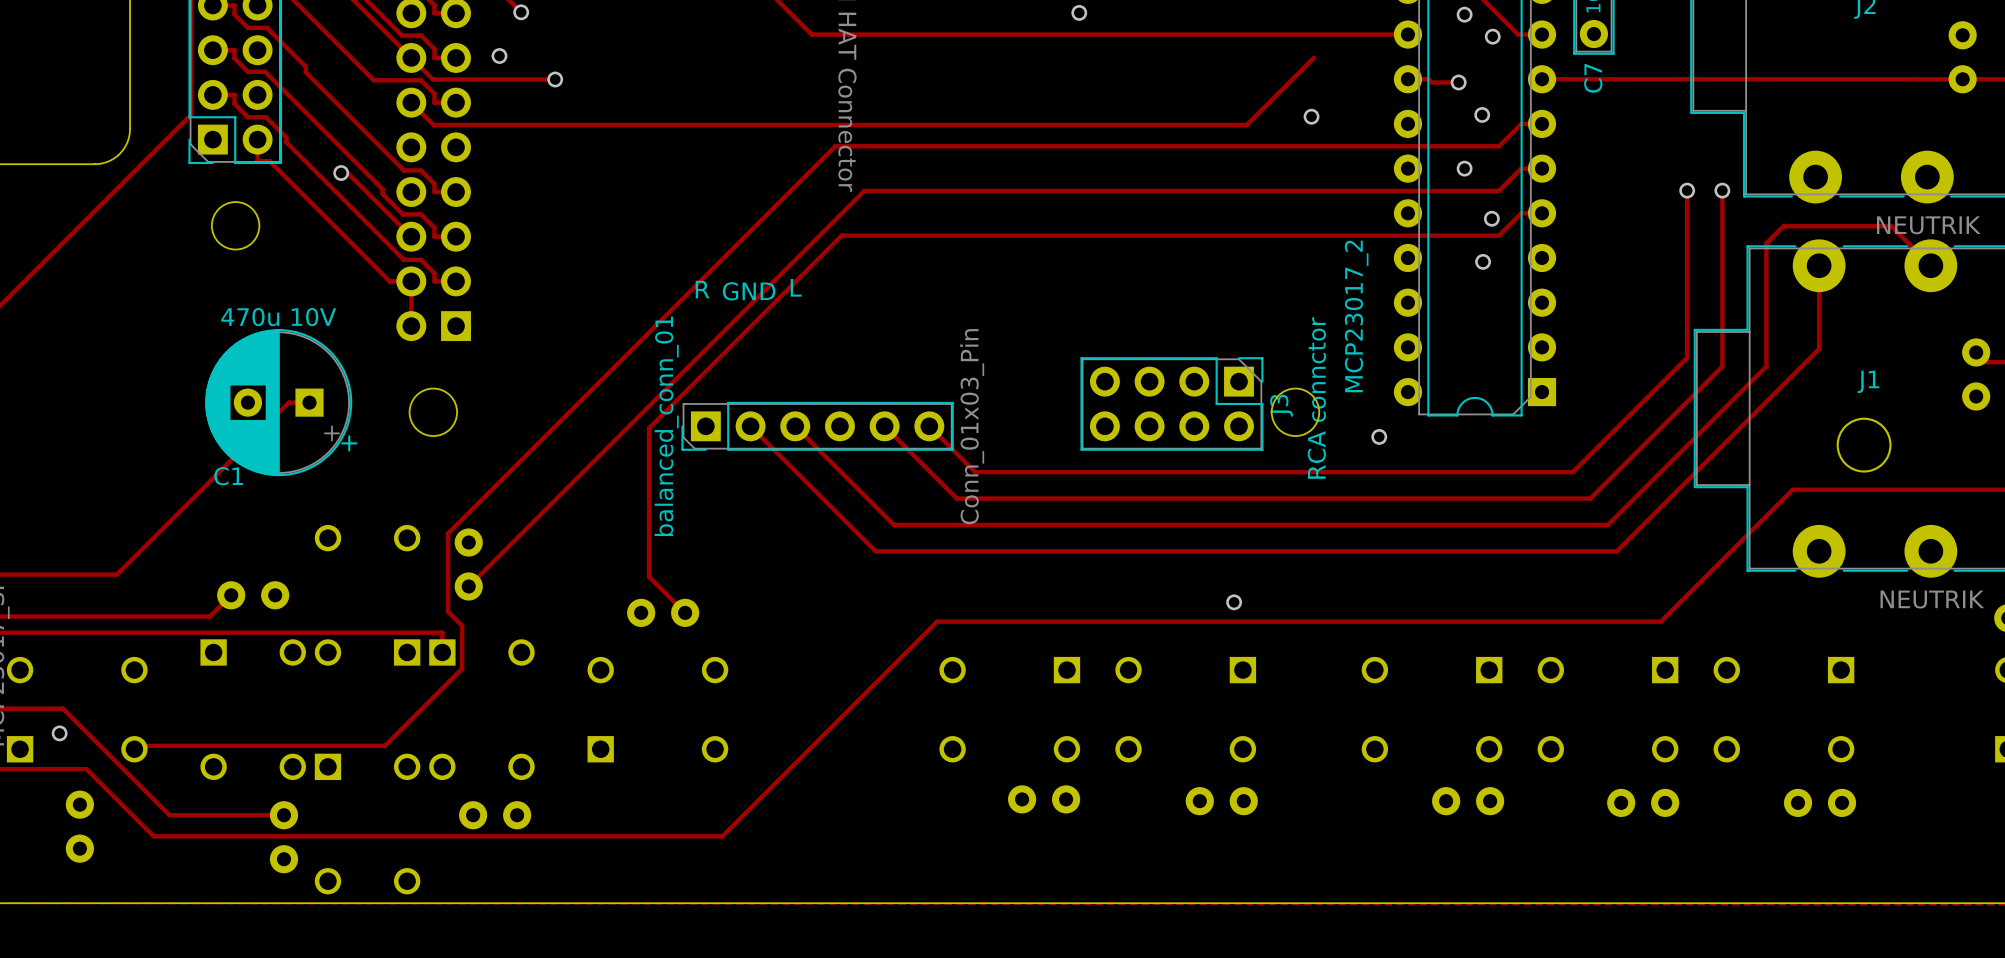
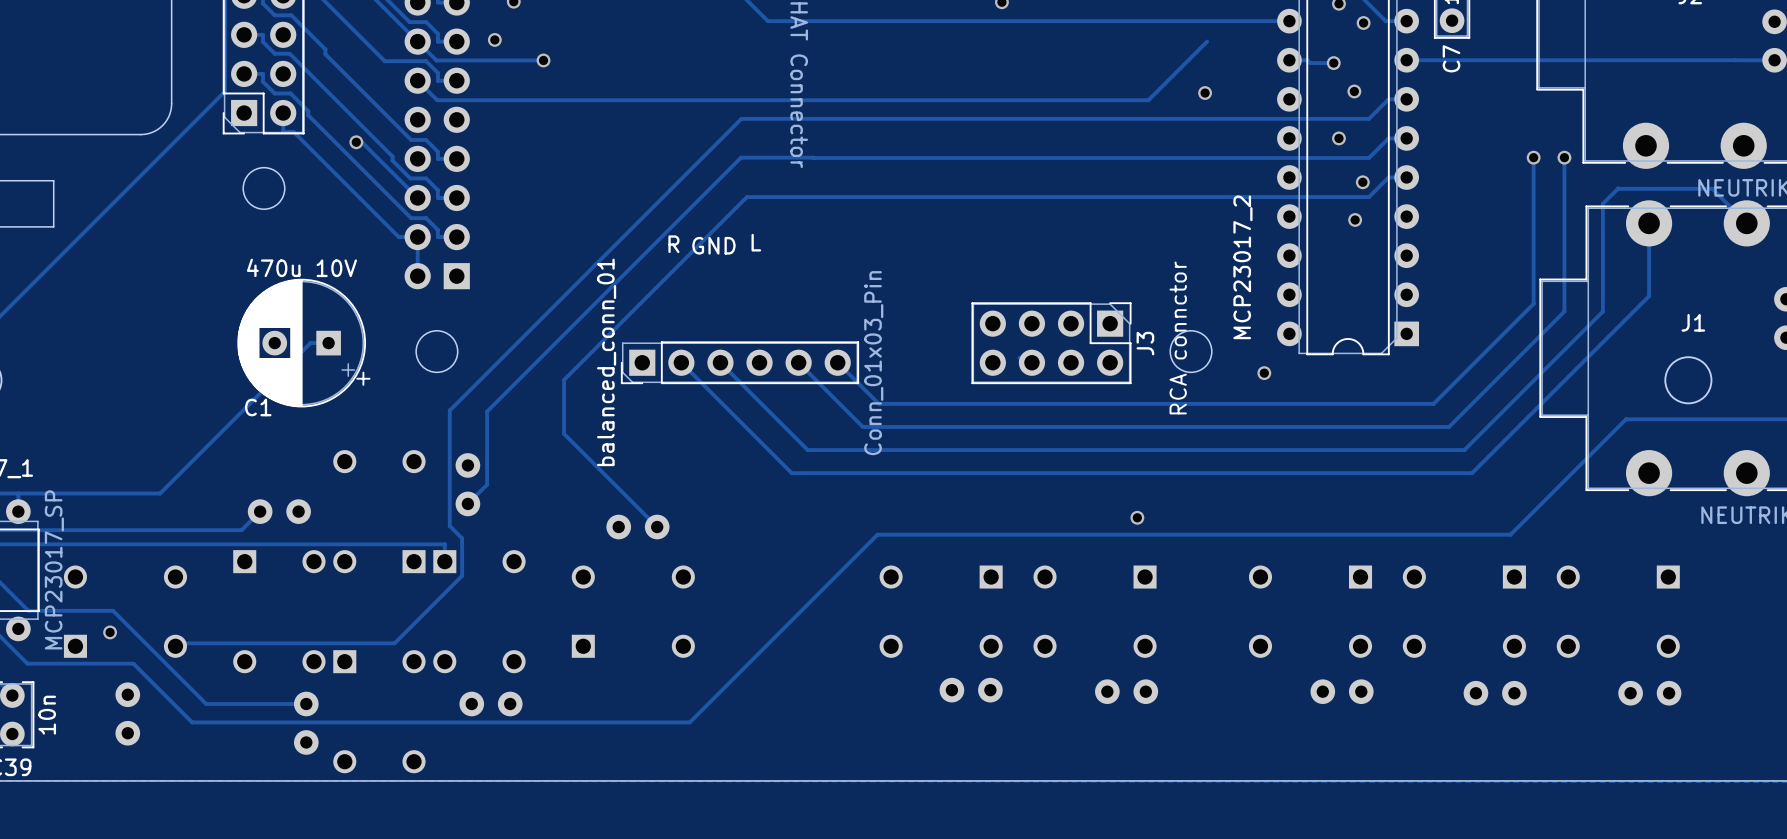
track: (835, 146) (448, 533) -> (788, 118) (741, 118) (449, 410) (449, 457)
track: (864, 190) (490, 564) -> (813, 157) (741, 157) (487, 411) (487, 484)
track: (841, 235) (649, 428) (649, 576) -> (794, 197) (746, 197) (564, 379) (564, 433) (625, 495)
J3 position: (1171, 403) -> (1051, 343)
track: (750, 426) (875, 551) -> (681, 362) (791, 473) (823, 473)
track: (795, 426) (893, 524) -> (720, 362) (807, 450) (839, 450)
balanced_conn_01 position: (817, 426) -> (740, 362)
track: (884, 426) (956, 498) -> (798, 362) (862, 426) (894, 426)
track: (929, 426) (975, 472) -> (837, 362) (878, 403) (910, 403)

